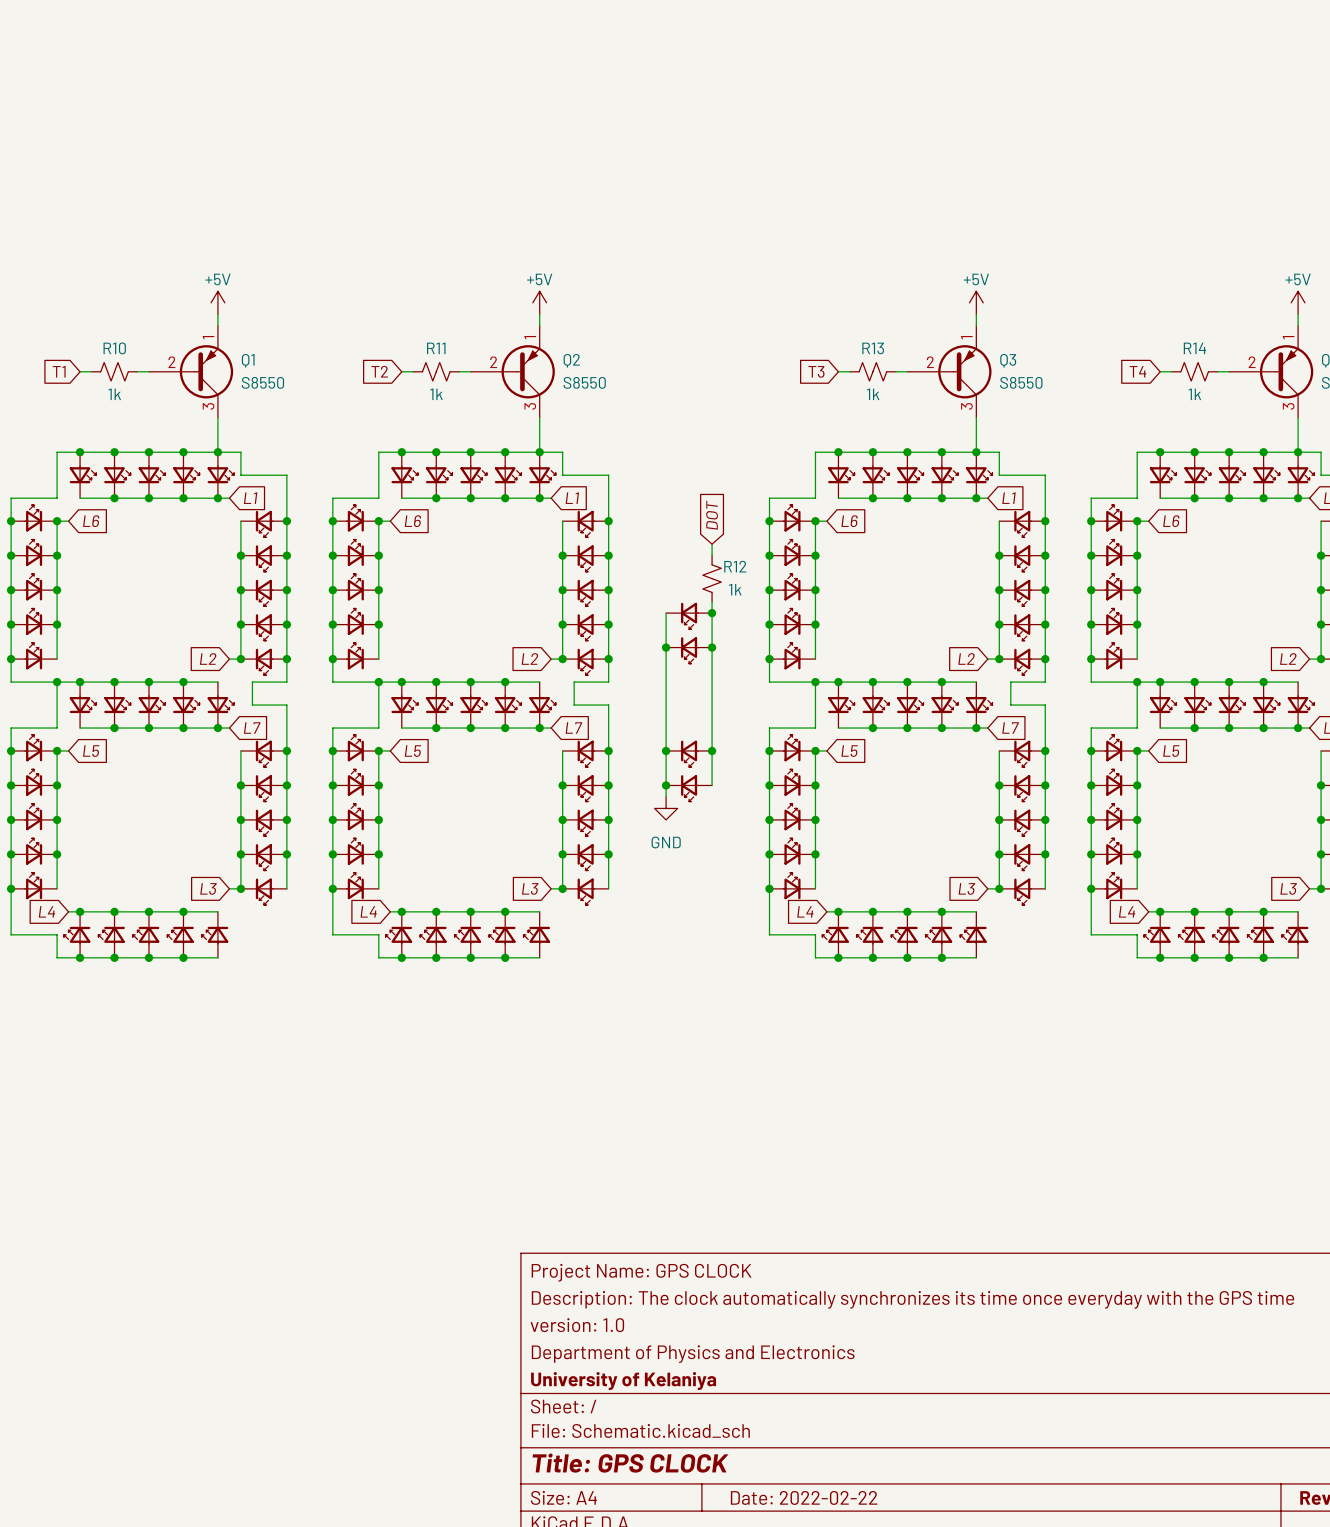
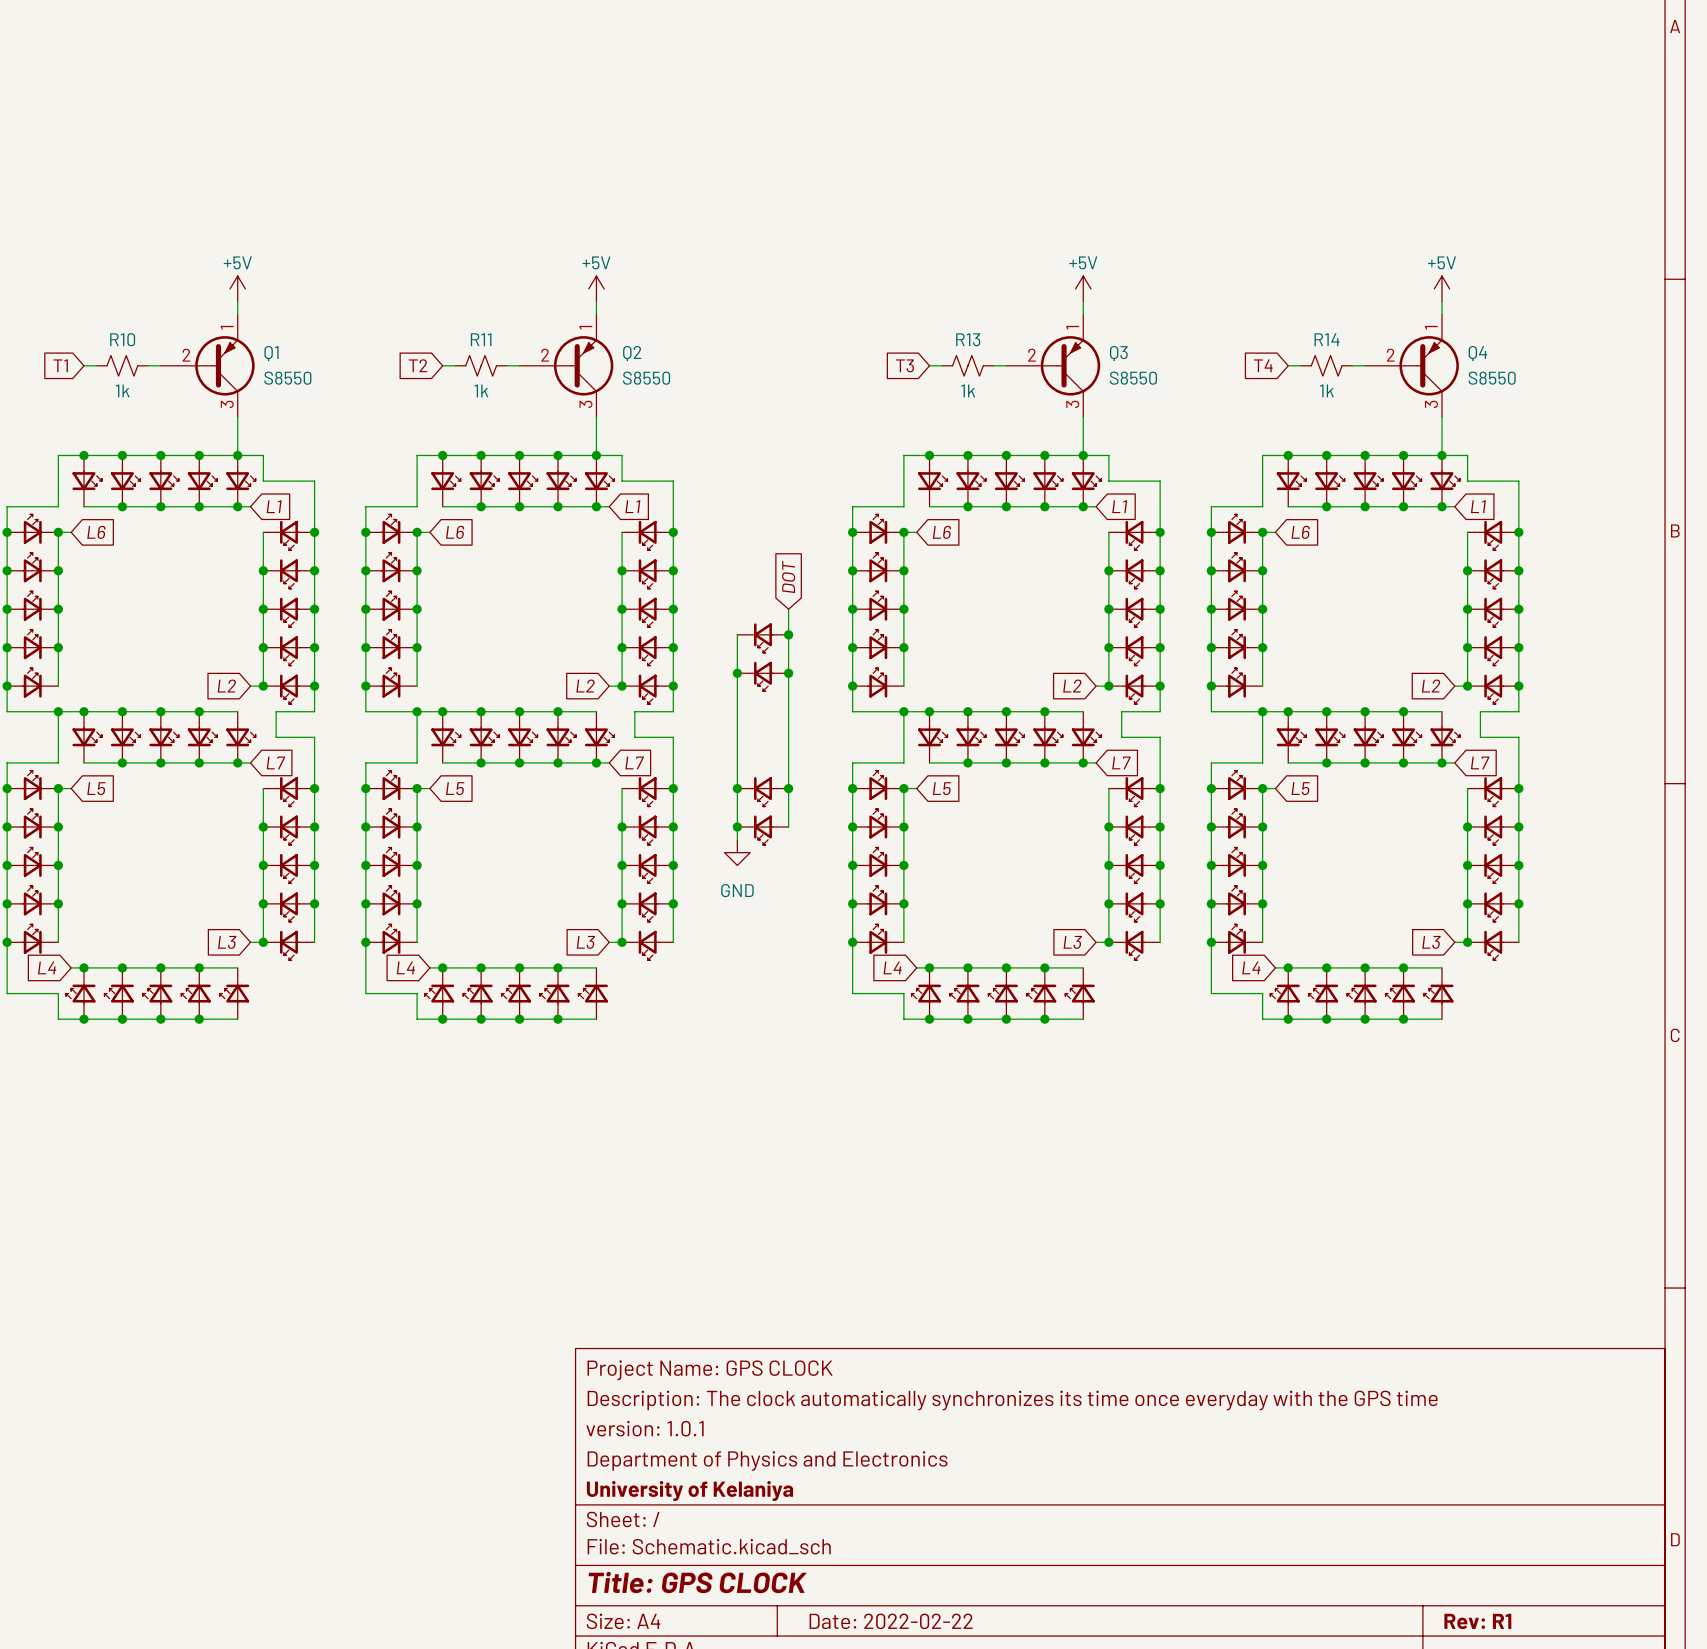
global label position: DOT (712, 515) -> DOT (788, 576)
R12: 1k (712, 578) -> none
title block: version: 1.0 (577, 1325) -> version: 1.0.1 (644, 1428)

